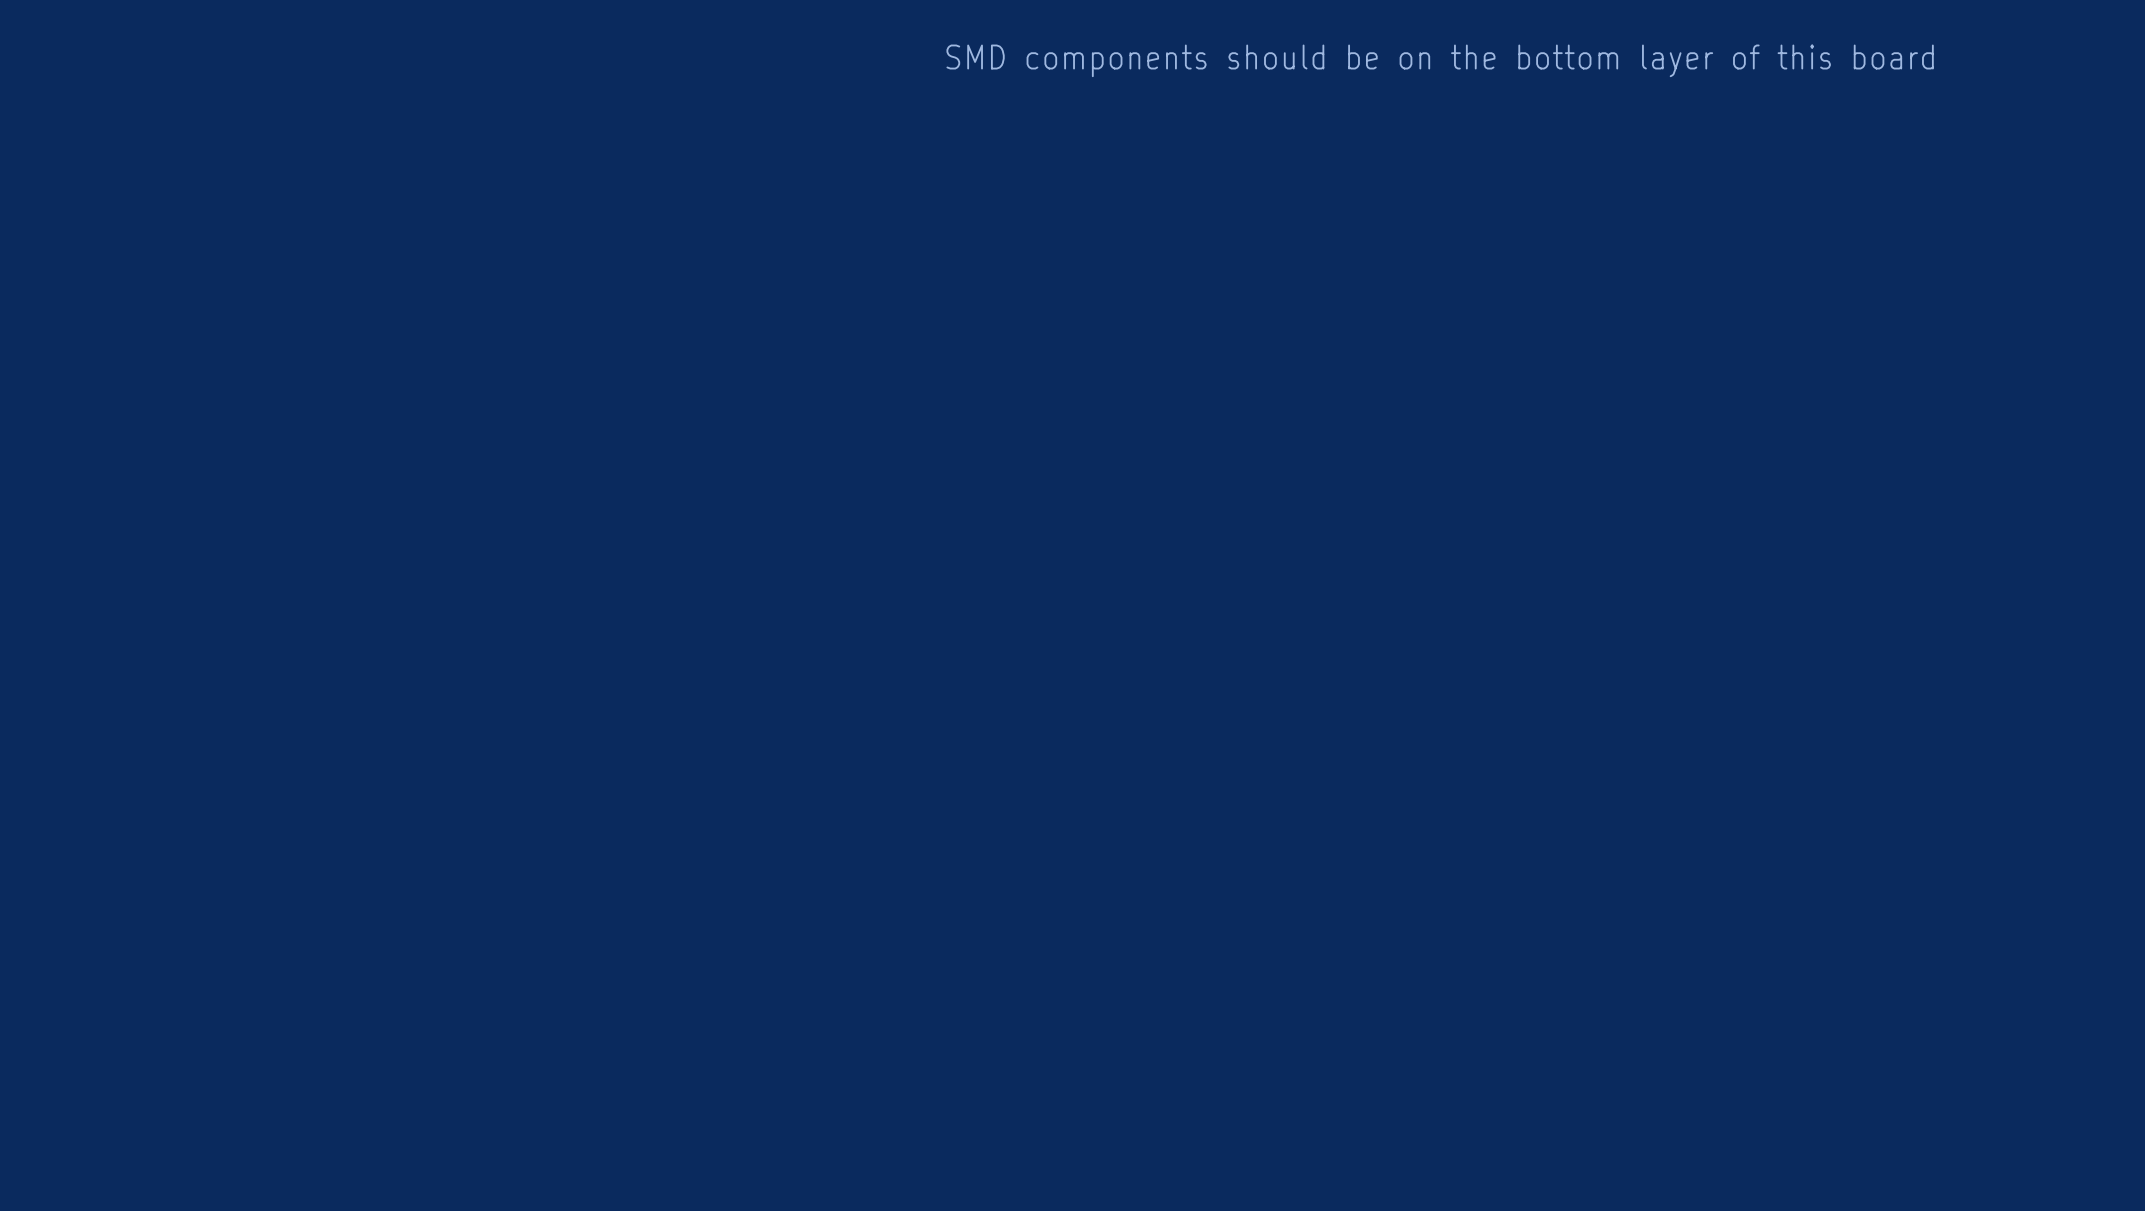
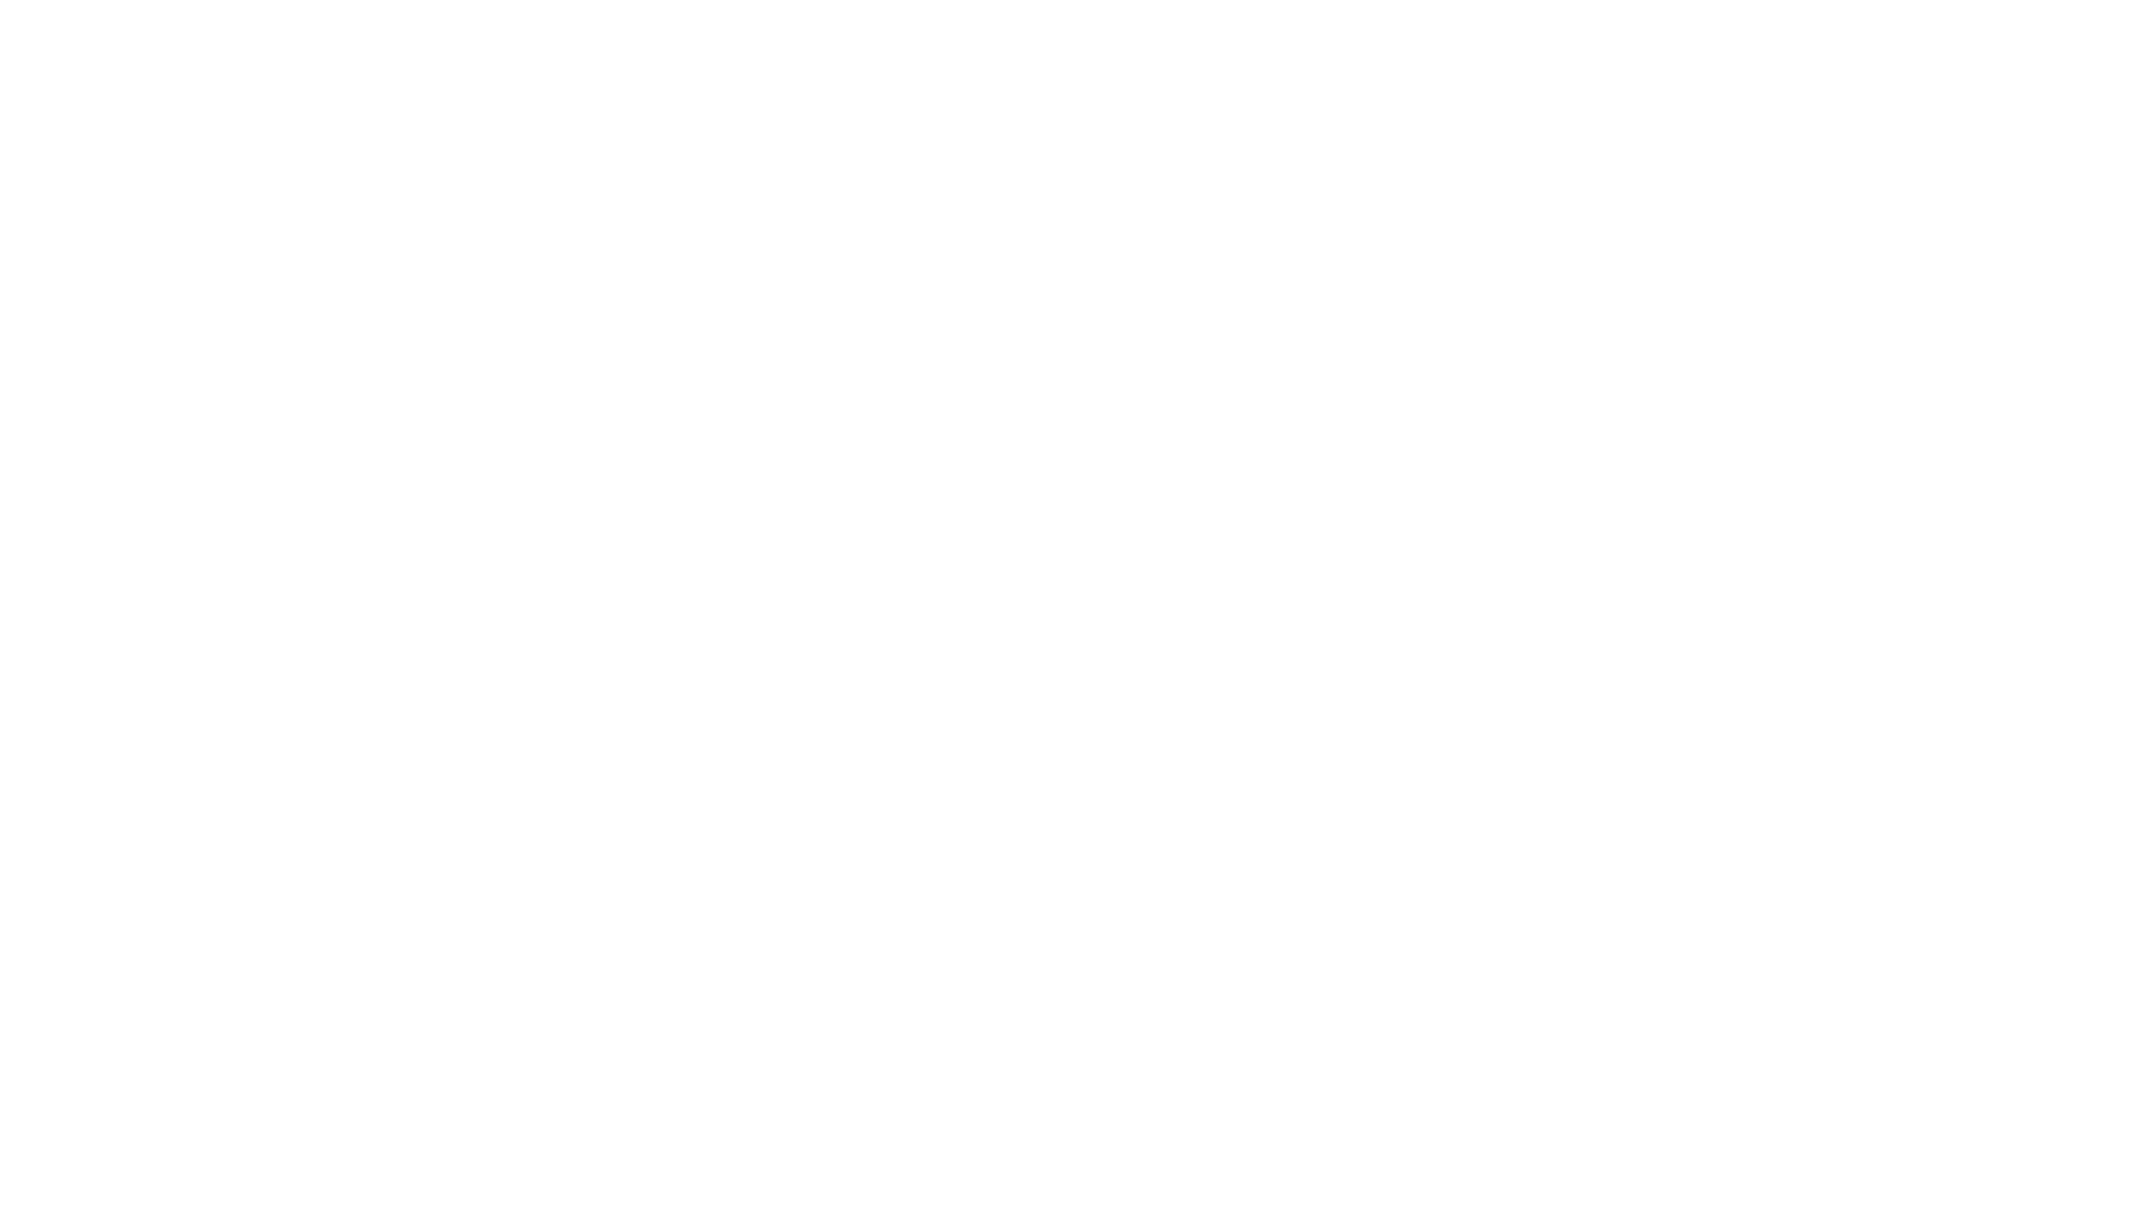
text: SMD components should be on the bottom layer of this board (1440, 60) -> none

